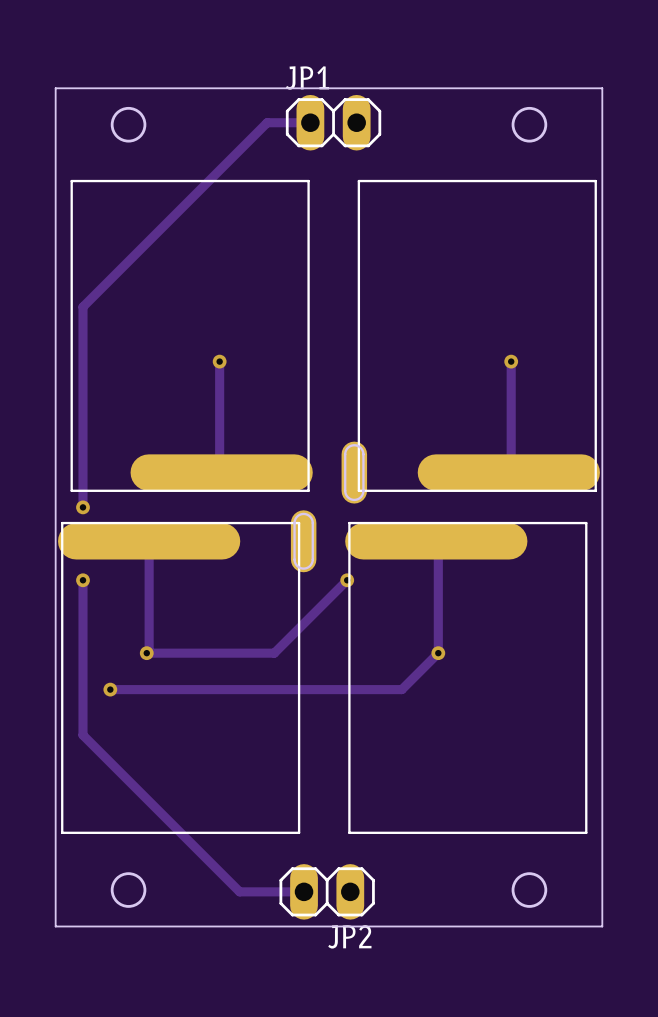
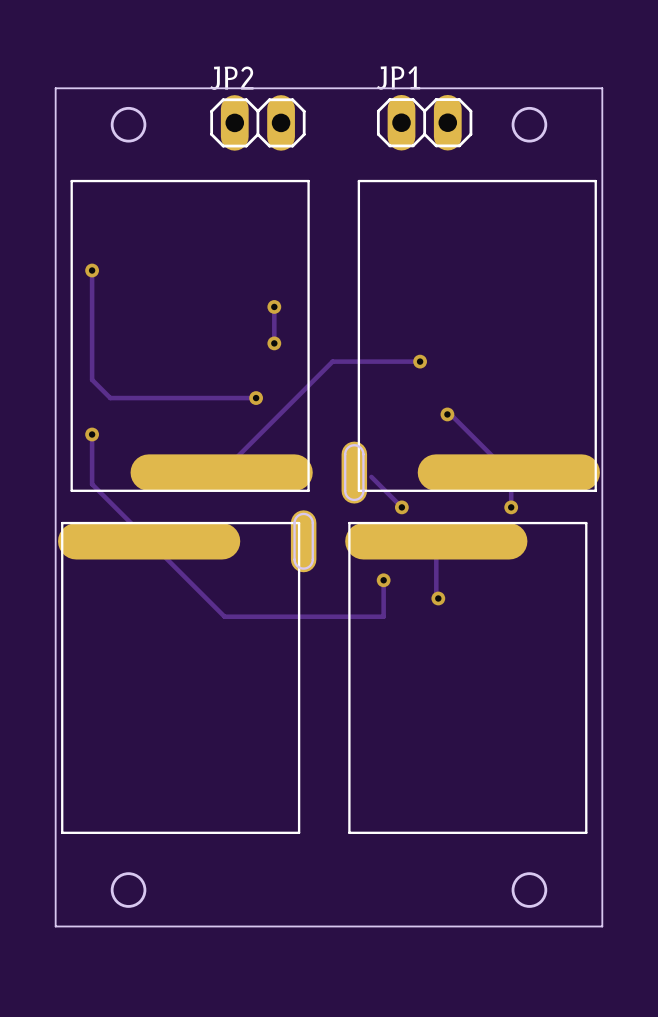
track: (310, 122) (267, 122) (82, 306) (82, 507) -> none
JP1 position: (333, 122) -> (424, 122)
track: none -> (92, 270) (92, 379) (110, 398) (256, 398)
via: none -> (92, 270)
track: none -> (274, 306) (274, 343)
via: none -> (274, 306)
via: none -> (274, 343)
track: (219, 361) (219, 470) (221, 472) -> (420, 361) (332, 361) (221, 472)
via: (219, 361) -> none
via: none -> (420, 361)
track: (511, 361) (511, 470) (508, 472) -> none
via: (511, 361) -> none
via: none -> (256, 398)
track: none -> (447, 414) (450, 414) (511, 474) (511, 507)
via: none -> (447, 414)
track: none -> (92, 434) (92, 484) (224, 616) (383, 616) (383, 580)
via: none -> (92, 434)
track: none -> (371, 476) (401, 507)
via: (82, 507) -> none
via: none -> (401, 507)
via: none -> (511, 507)
track: (149, 541) (149, 650) (146, 653) (274, 653) (347, 580) -> none
track: (436, 541) (438, 543) (438, 653) (401, 689) (110, 689) -> (436, 541) (436, 596) (438, 598)
track: (82, 580) (82, 735) (239, 891) (304, 891) -> none
via: (82, 580) -> none
via position: (347, 580) -> (383, 580)
via: none -> (438, 598)
via: (146, 653) -> none
via: (438, 653) -> none
via: (110, 689) -> none
JP2 position: (327, 891) -> (257, 122)
JP2 name position: JP2 (349, 936) -> JP2 (231, 78)

